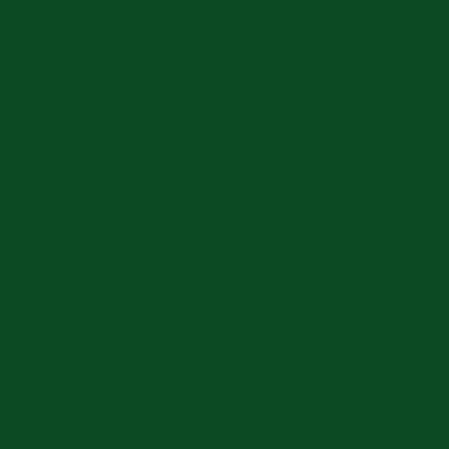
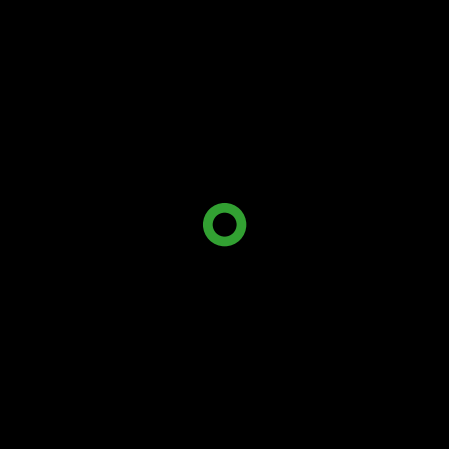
via: none -> (224, 224)

